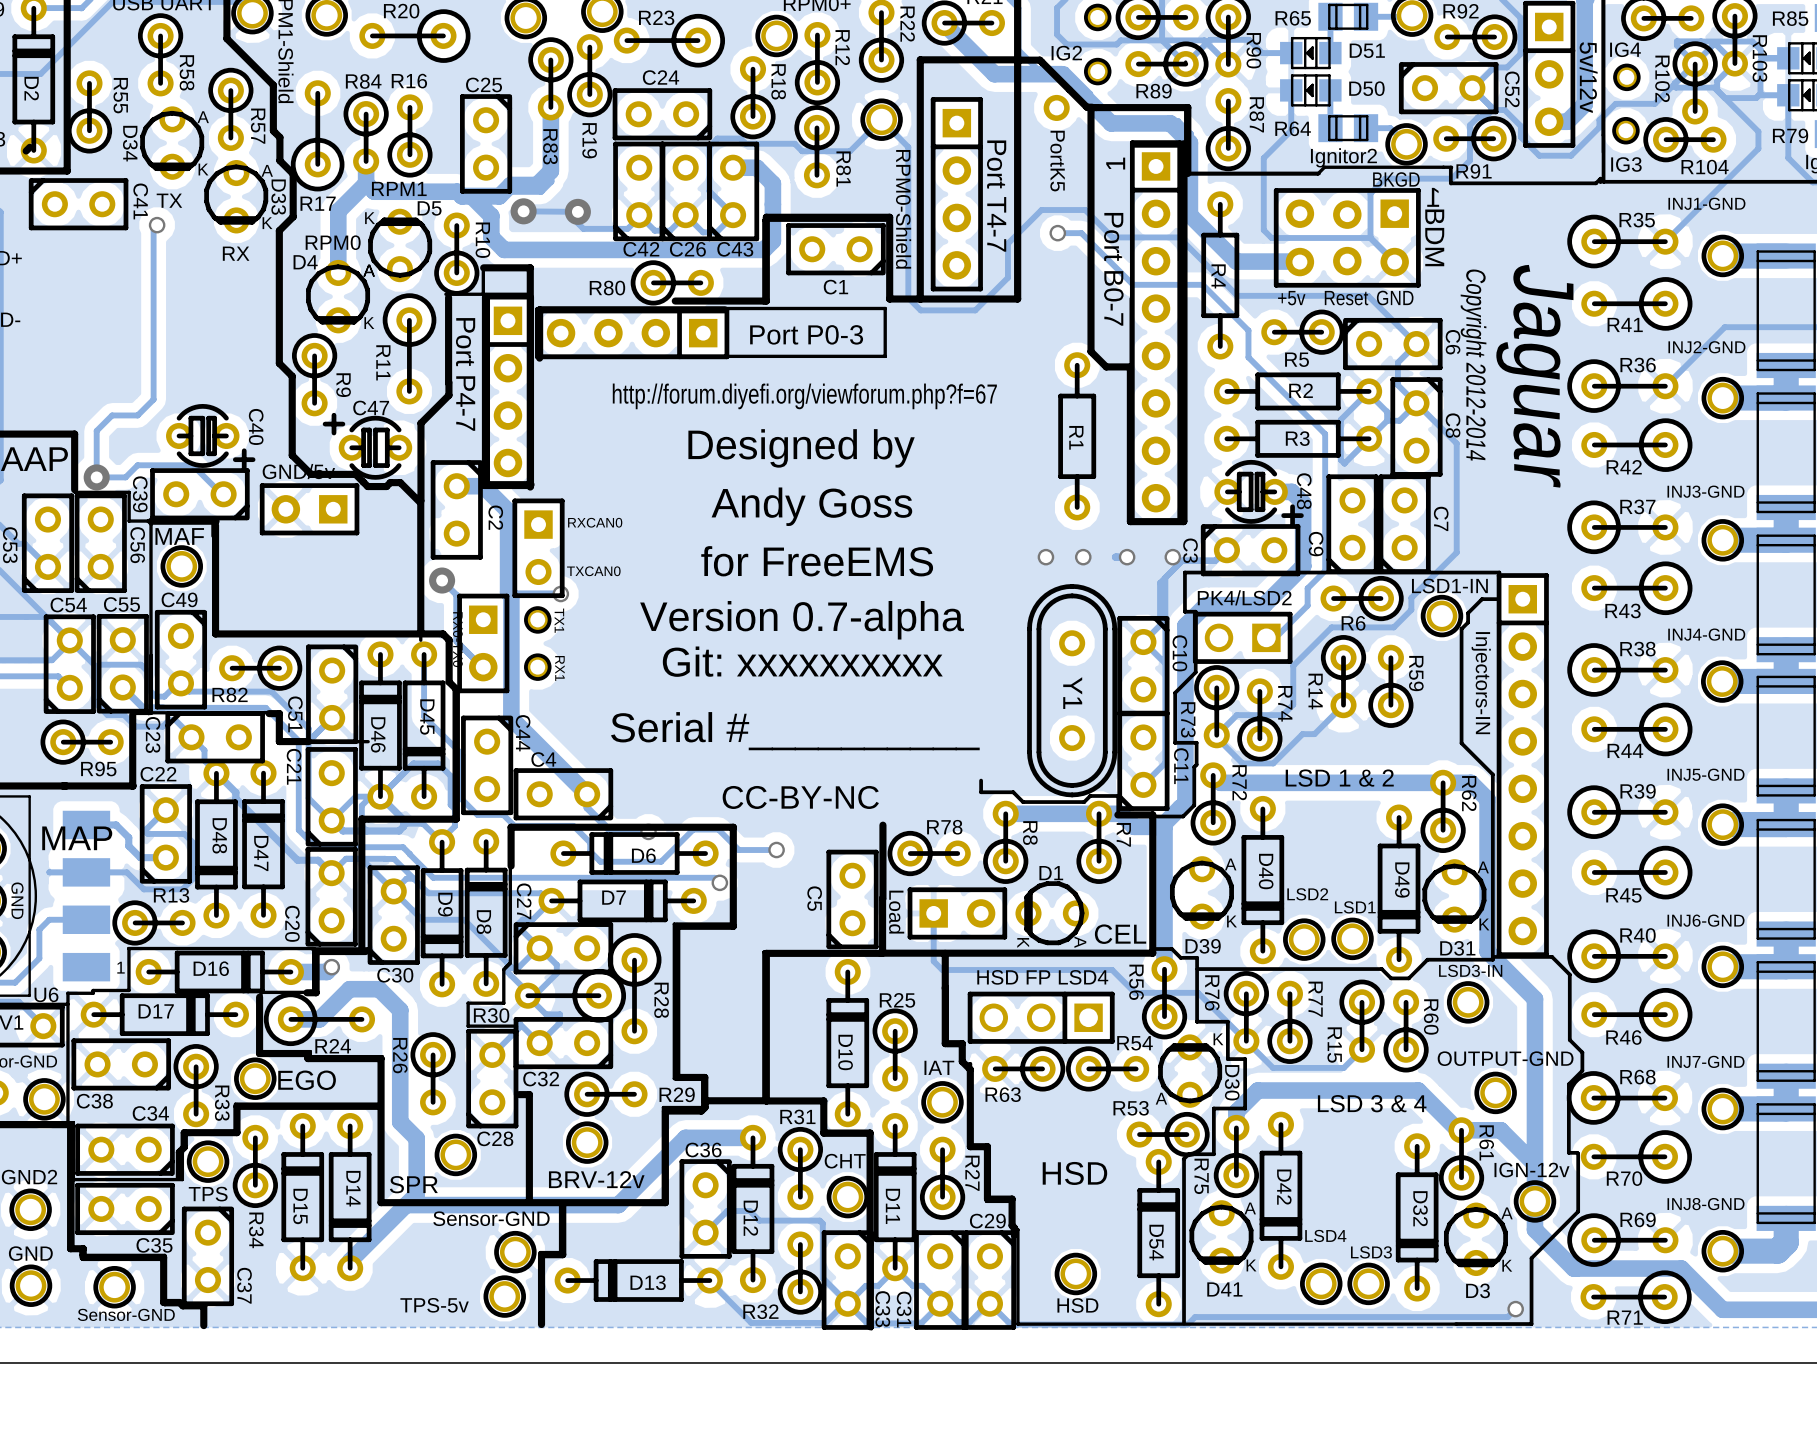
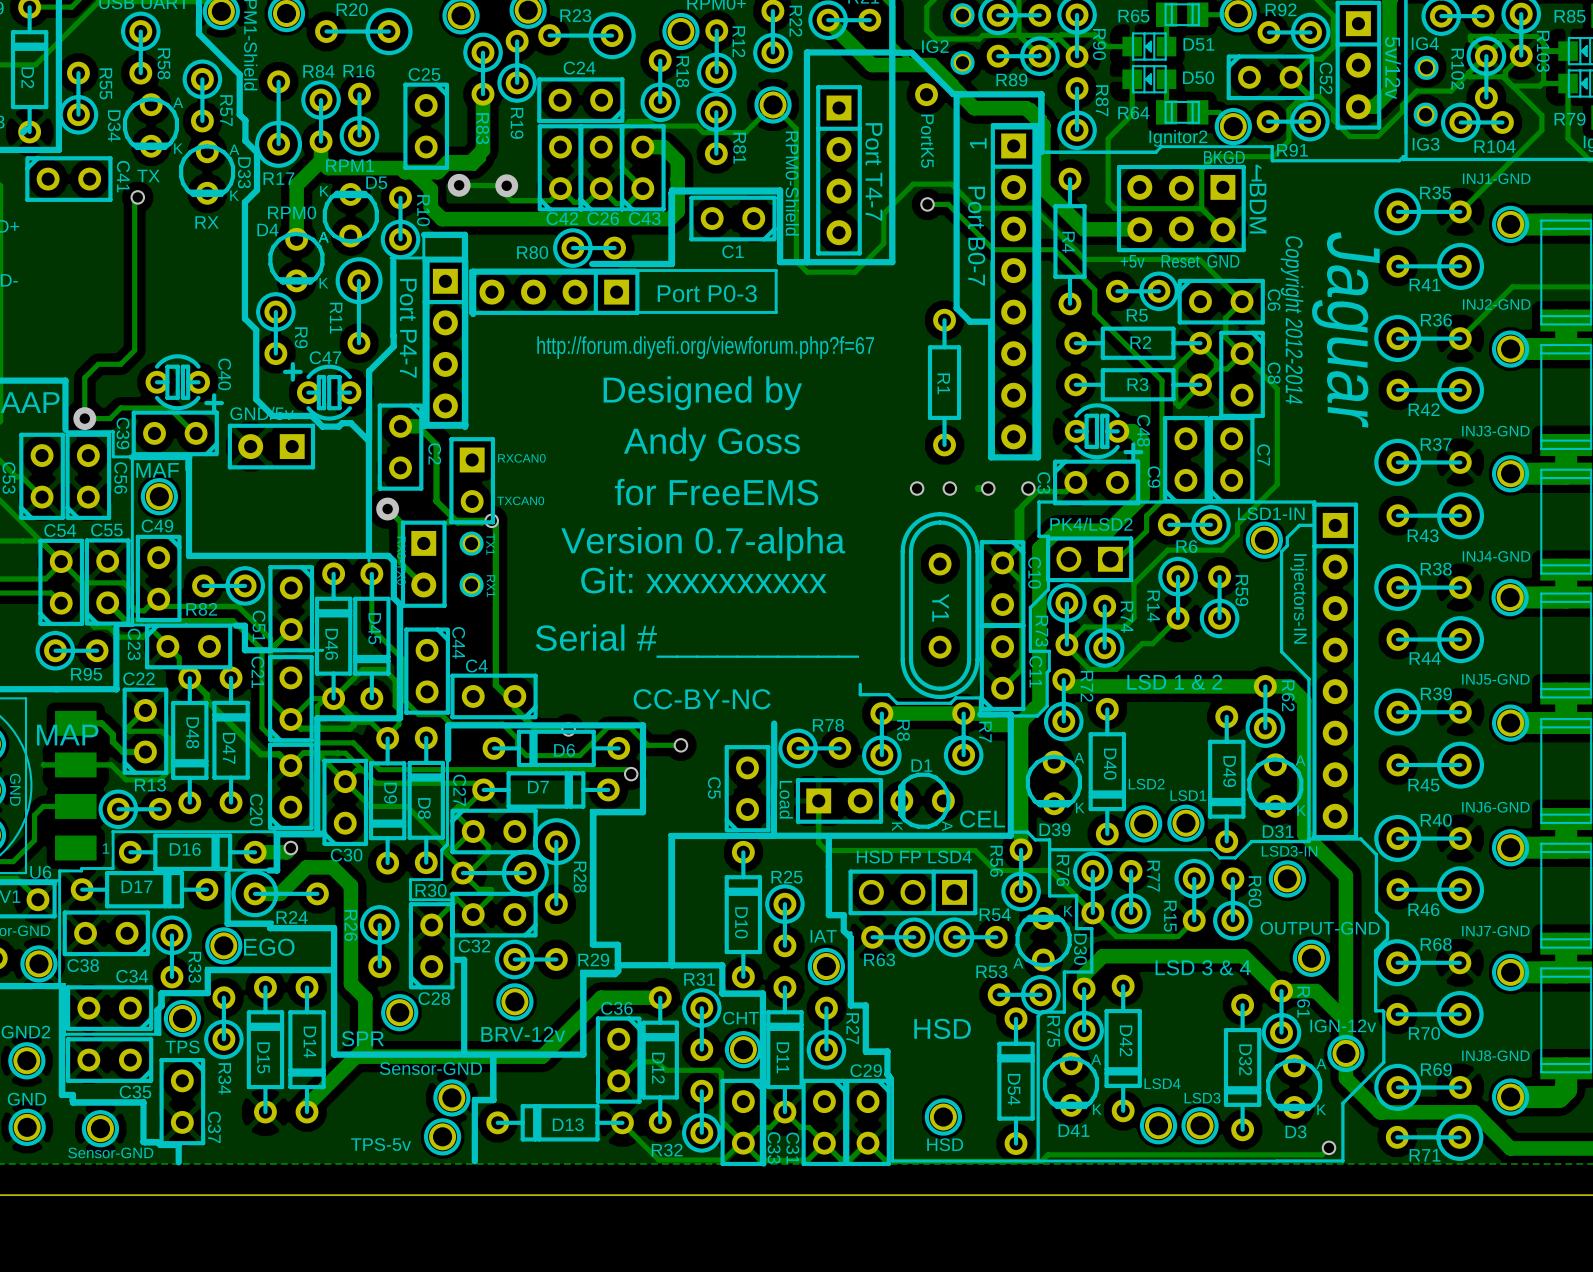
track: (476, 486) (483, 486) (508, 510) (508, 592) (511, 595) (511, 718) (587, 794) -> (418, 426) (436, 444) (436, 501) (457, 522) (481, 522) (483, 520)
track: none -> (491, 520) (495, 524) (495, 685) (507, 696)

